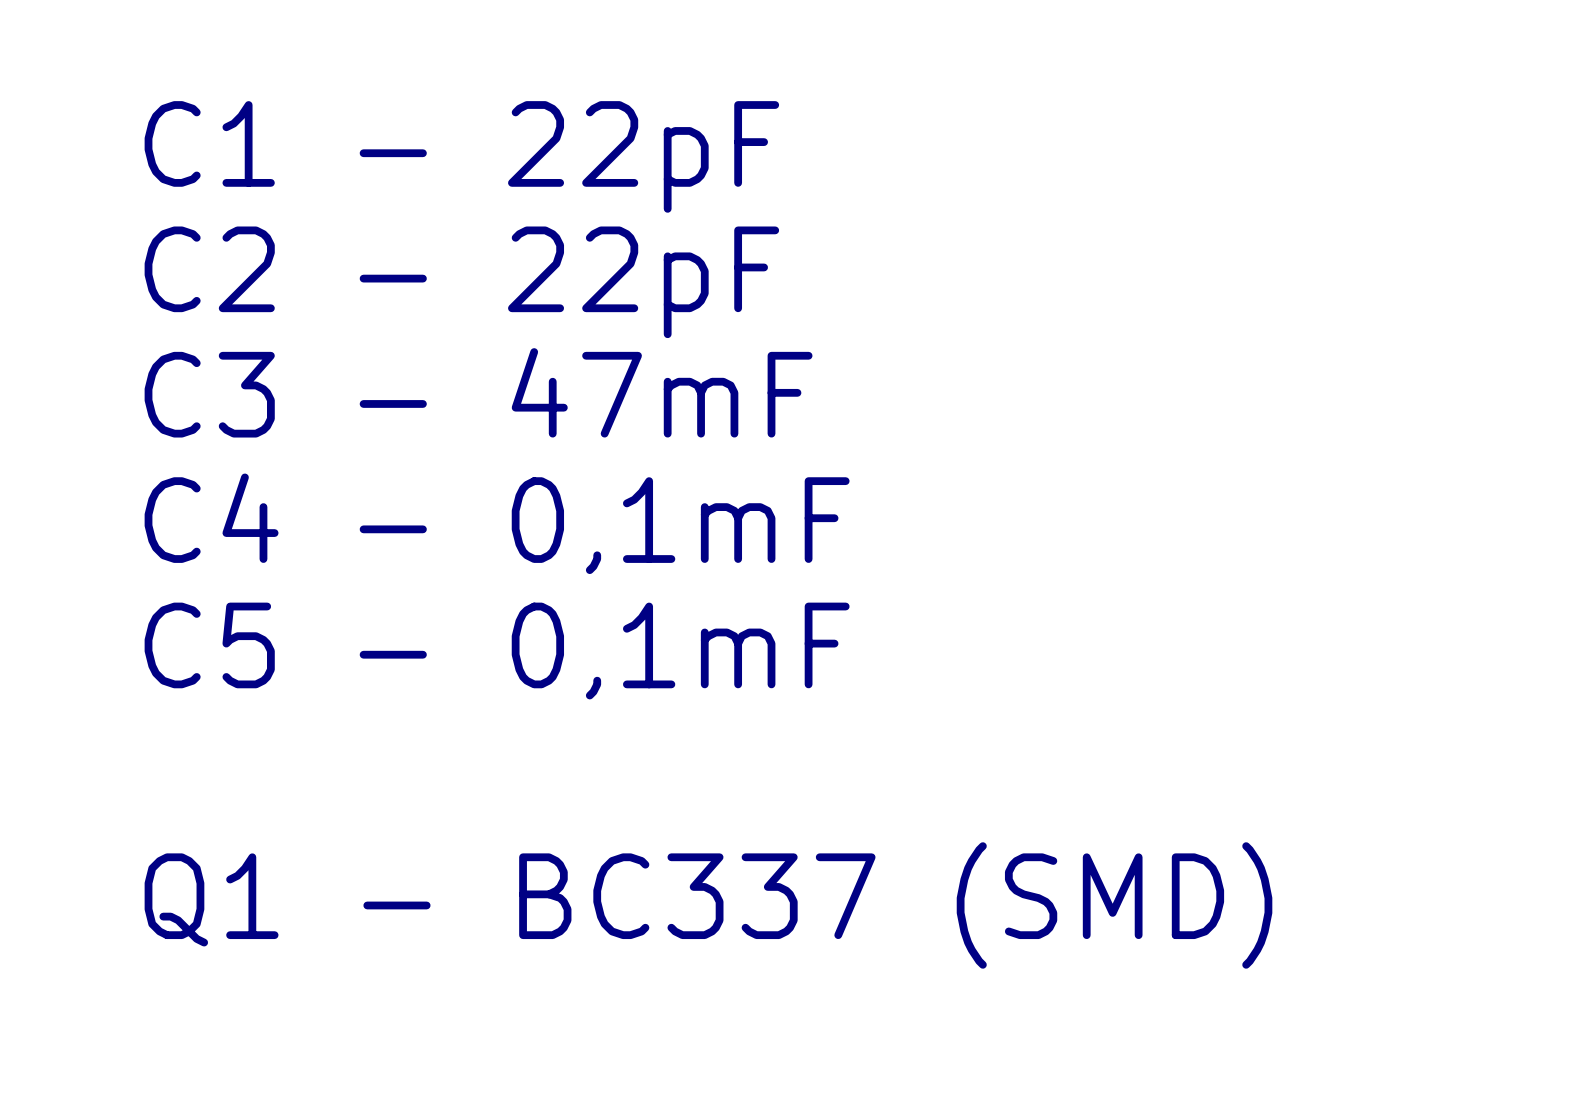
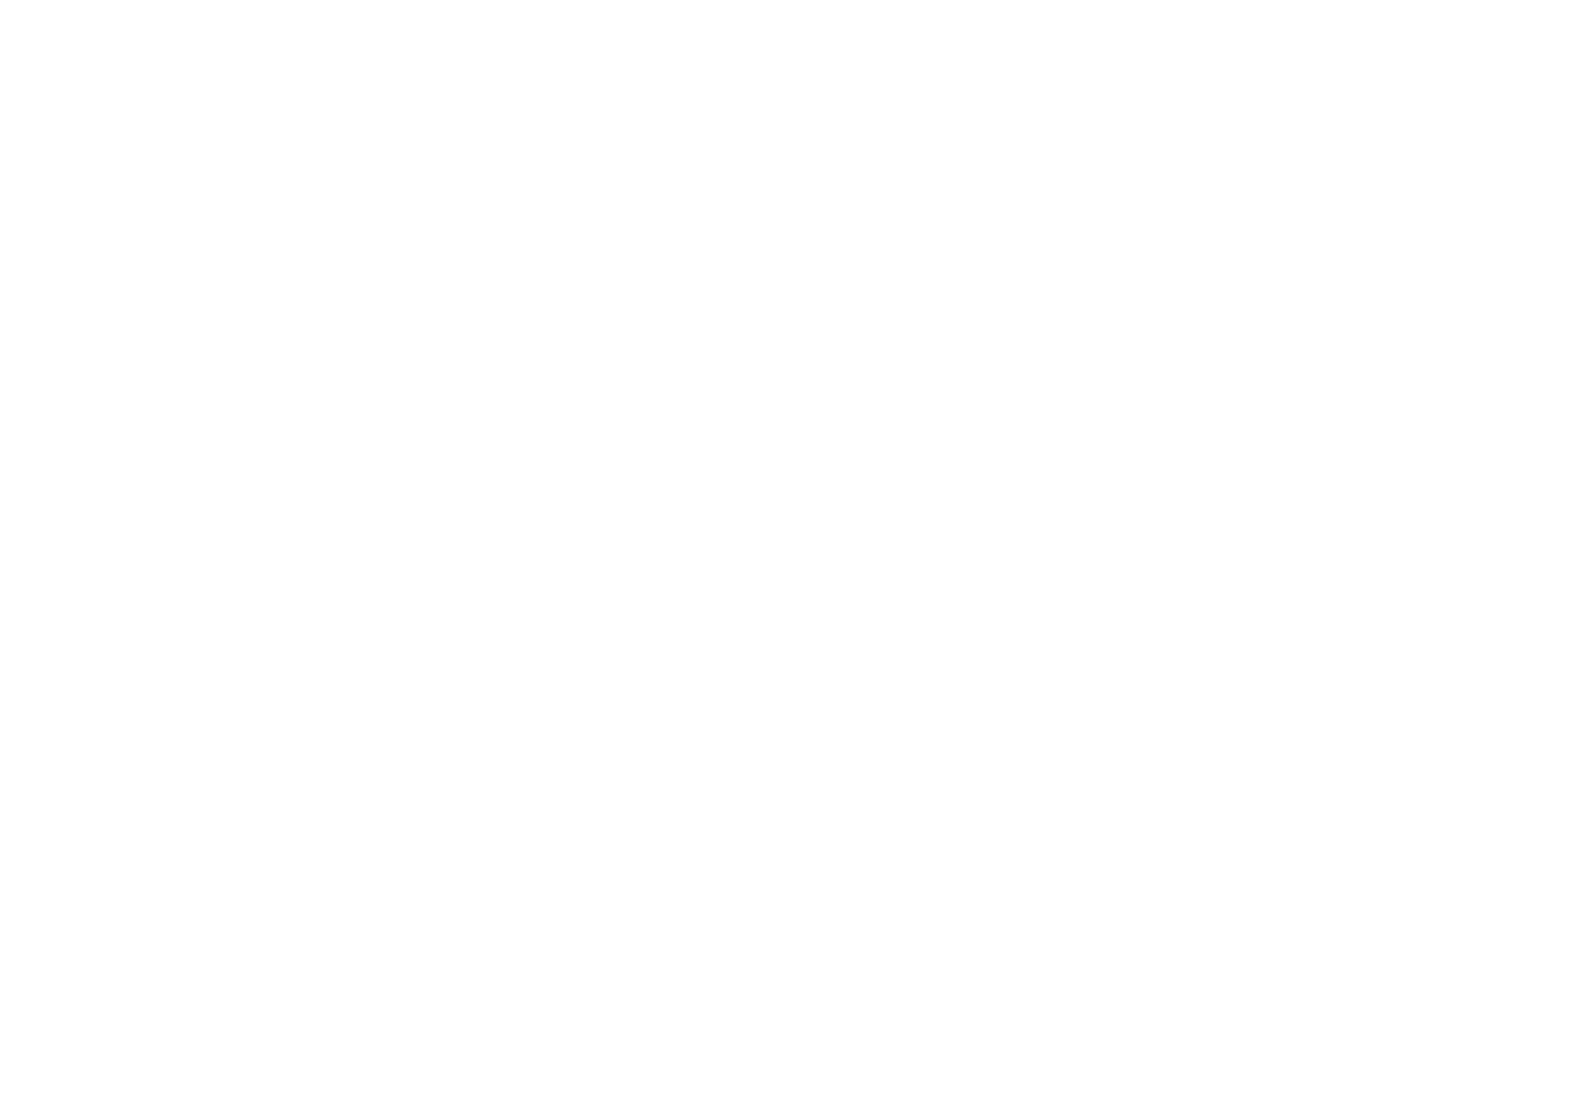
text: C1 - 22pF (461, 156) -> none
text: C2 - 22pF (461, 282) -> none
text: C3 - 47mF (478, 392) -> none
text: C4 - 0,1mF (497, 523) -> none
text: C5 - 0,1mF (497, 651) -> none
text: Q1 - BC337 (SMD) (708, 905) -> none

